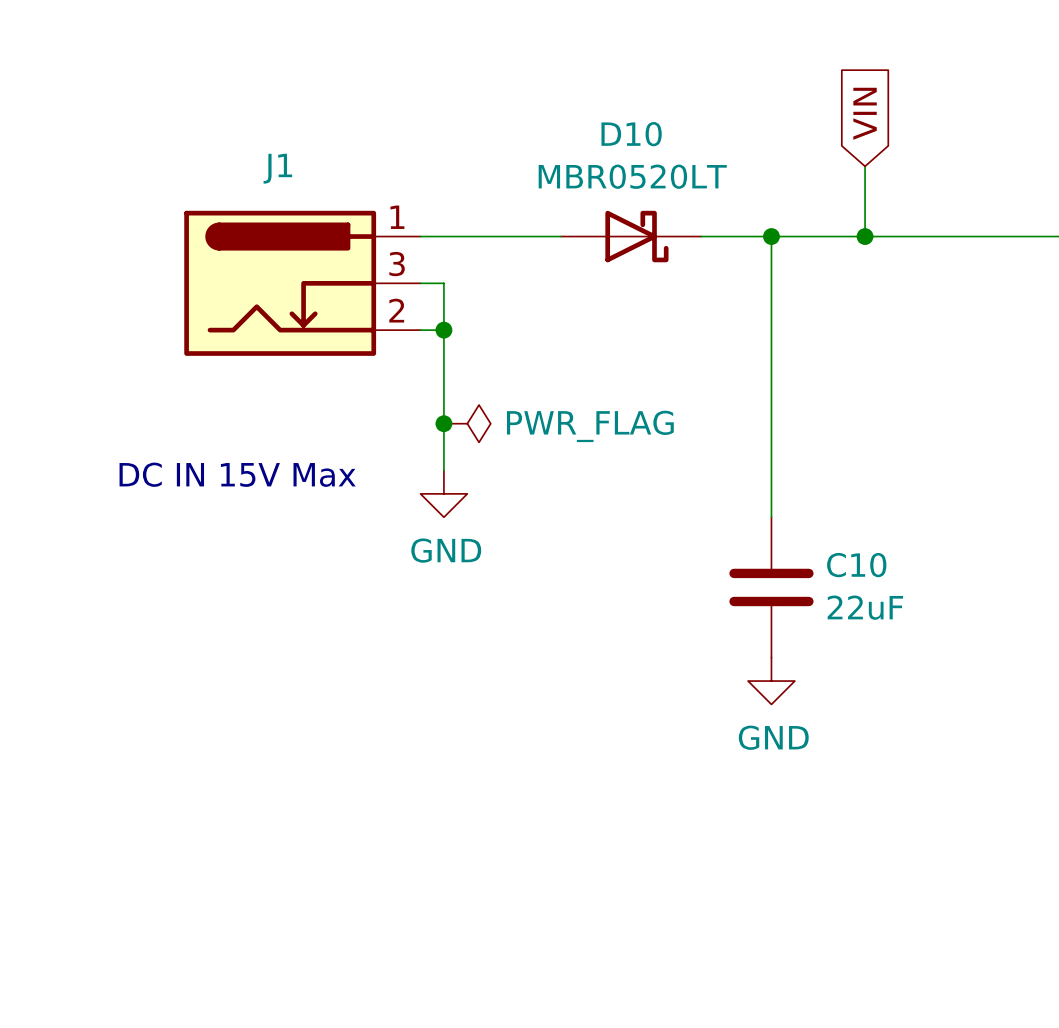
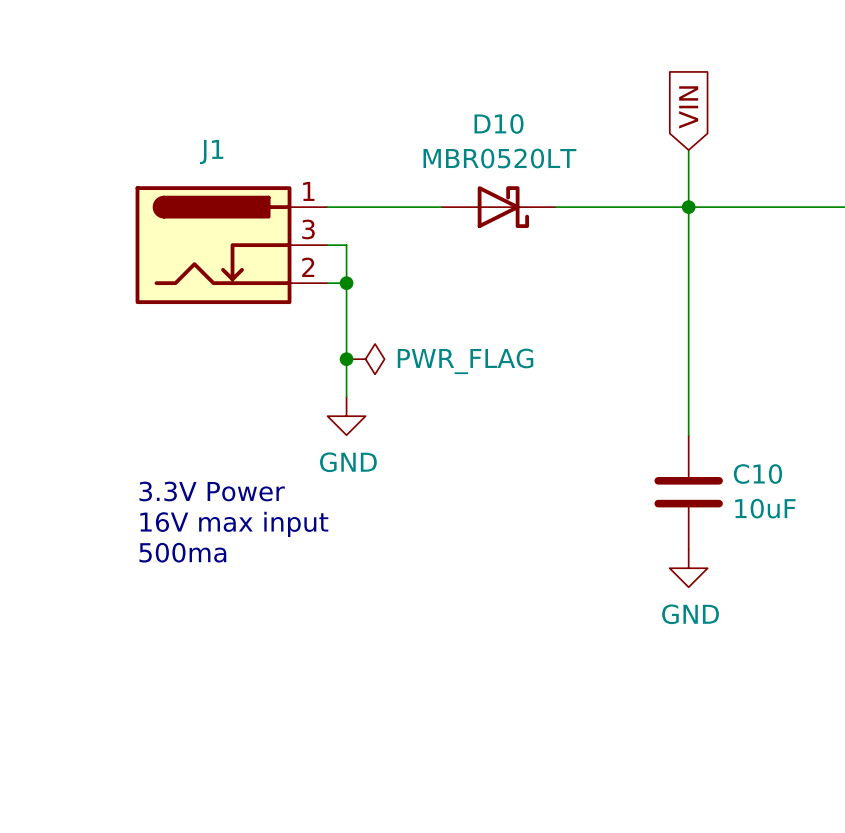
wire: (771, 236) (771, 517) -> (688, 207) (688, 435)
junction: (771, 236) -> none
text: DC IN 15V Max (237, 474) -> none
text: none -> 3.3V Power (212, 491)
C10 position: (771, 587) -> (688, 492)
C10 value: 22uF (865, 607) -> 10uF (765, 508)
text: none -> 16V max input (234, 524)
text: none -> 500ma (182, 552)
power symbol position: GND (771, 681) -> GND (688, 568)

